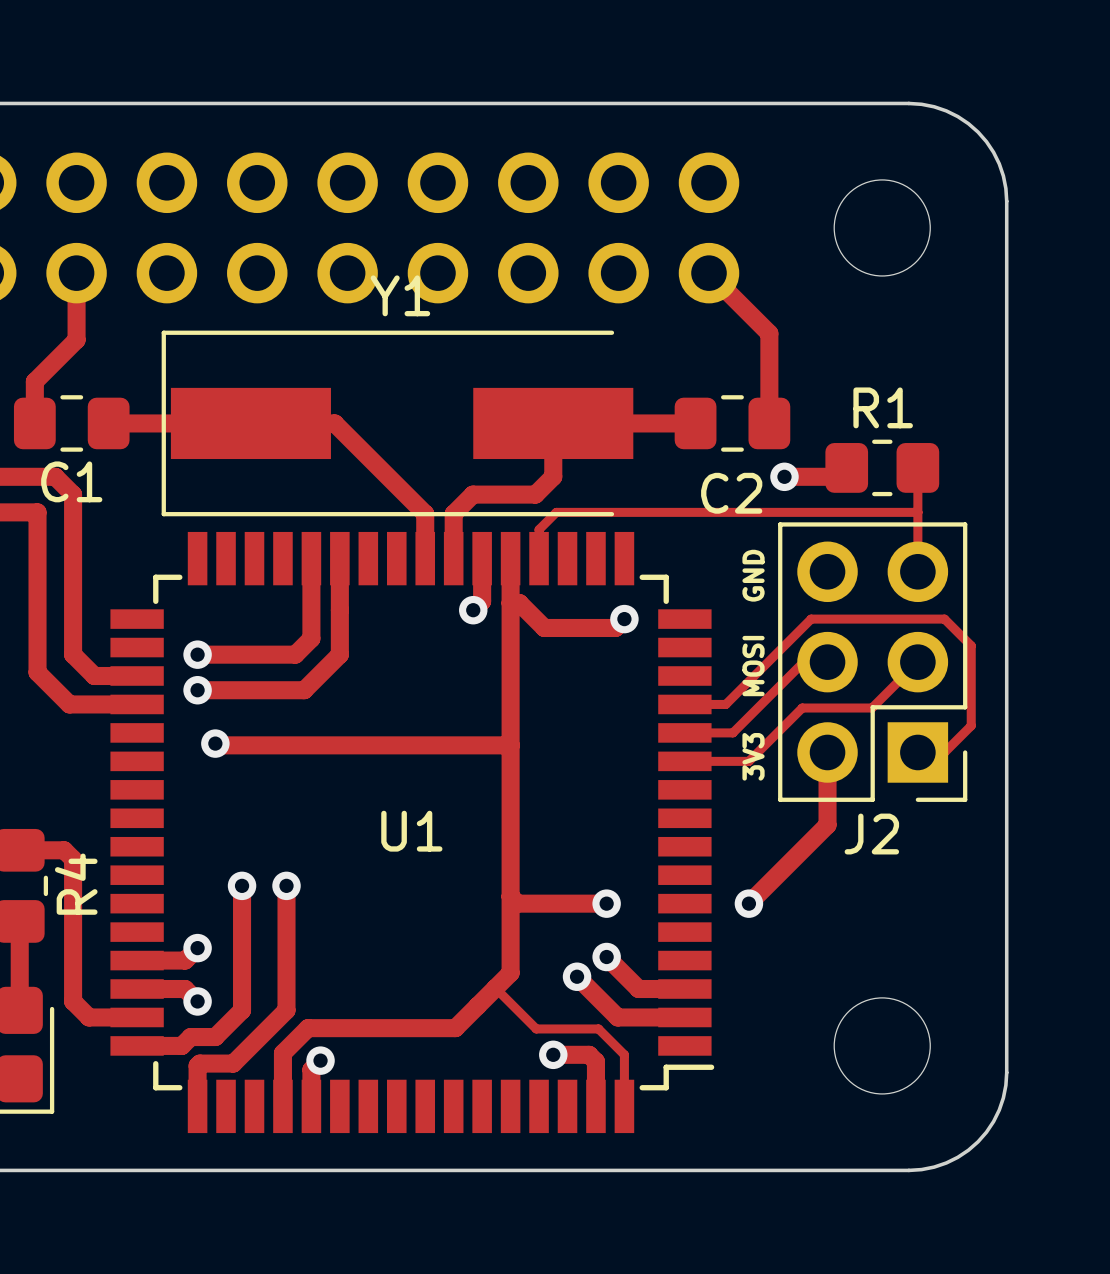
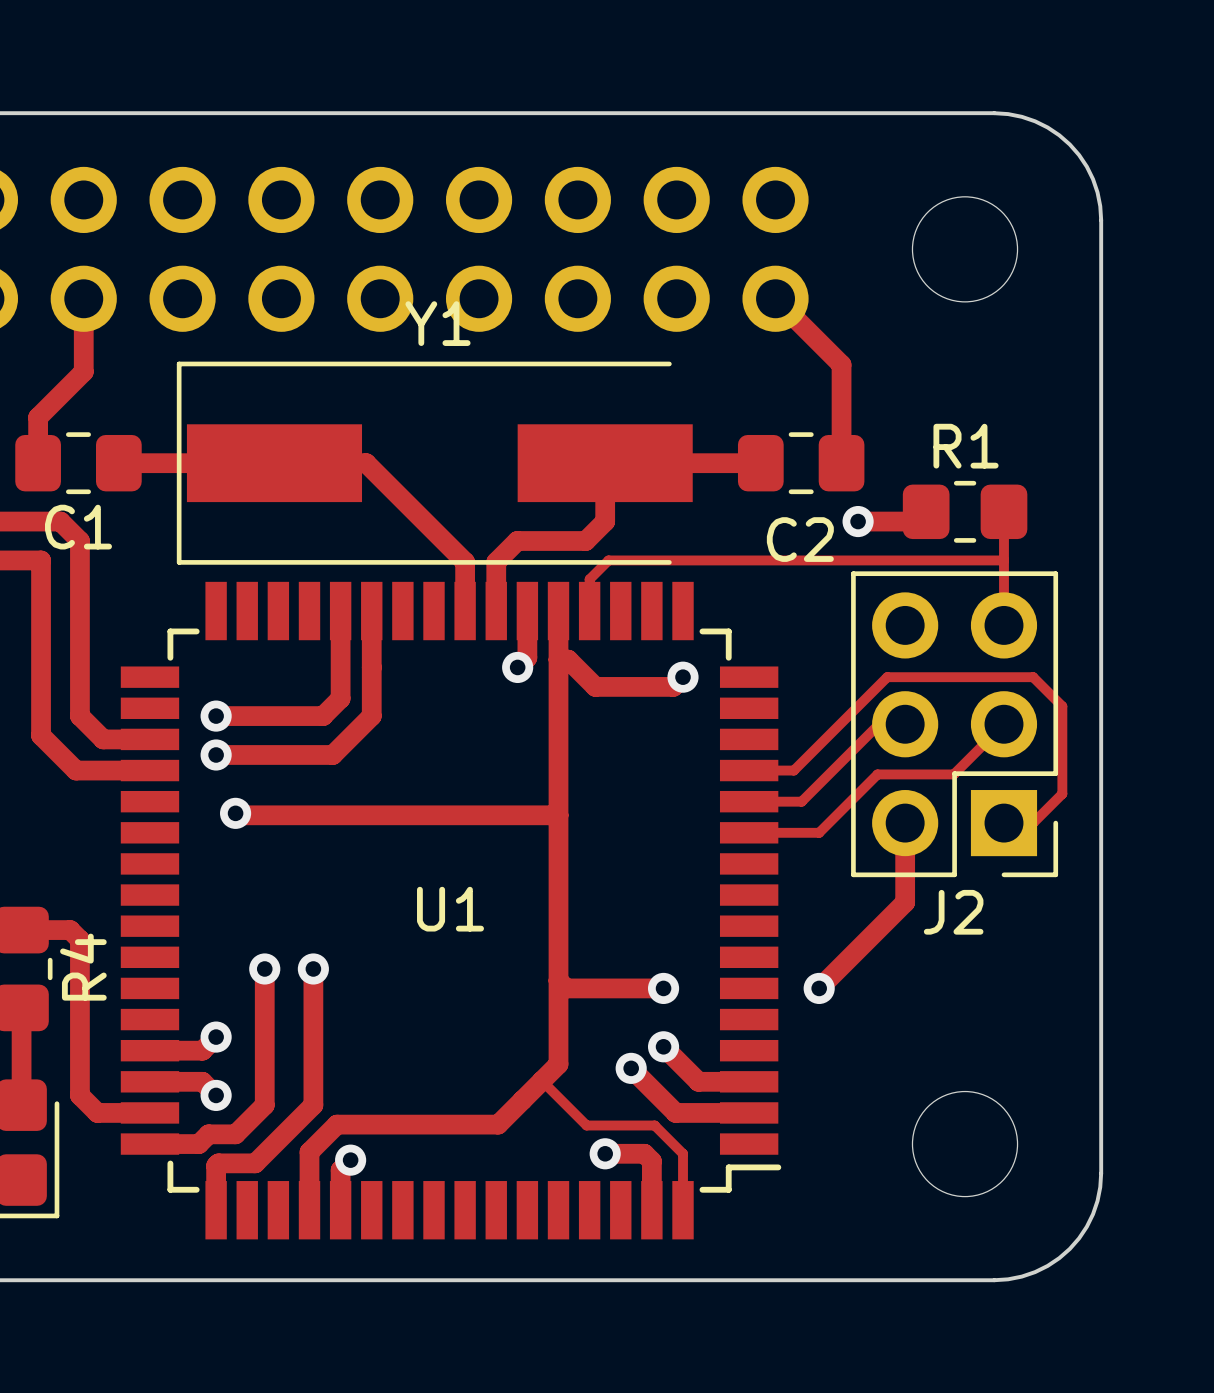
text: GND (753, 575) -> none
text: MOSI (753, 666) -> none
text: 3V3 (753, 756) -> none

